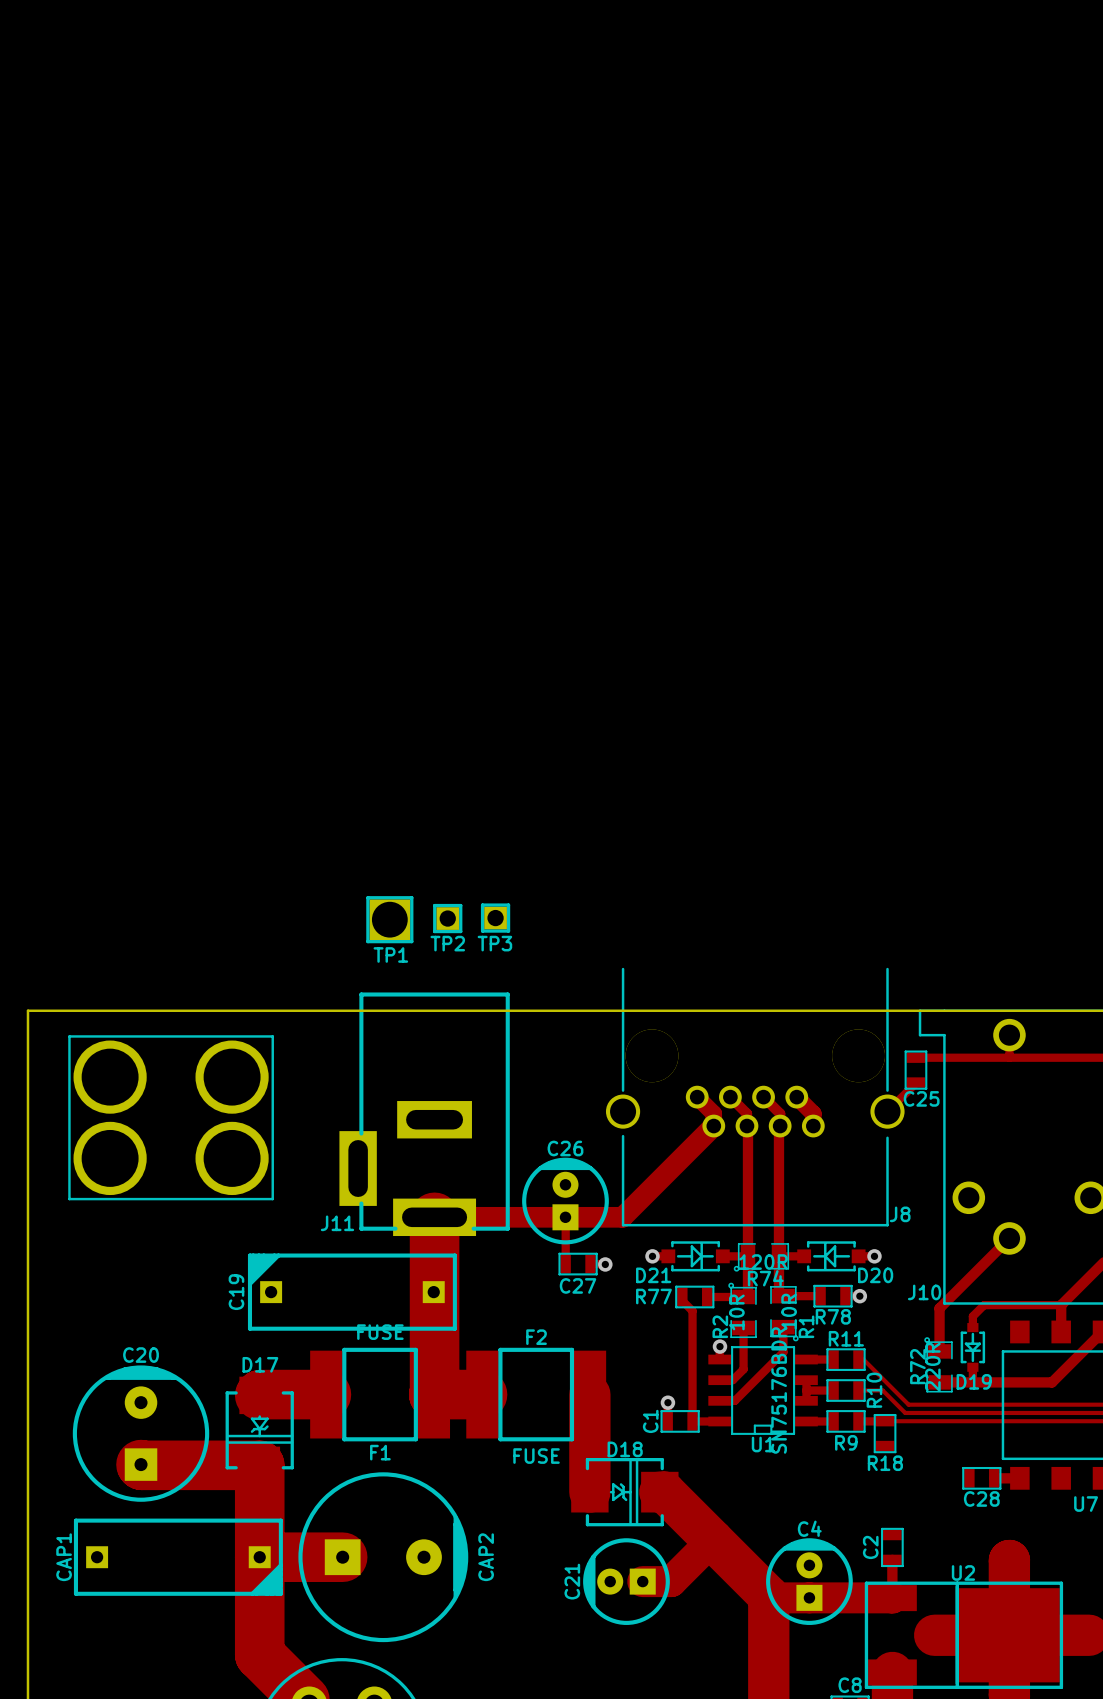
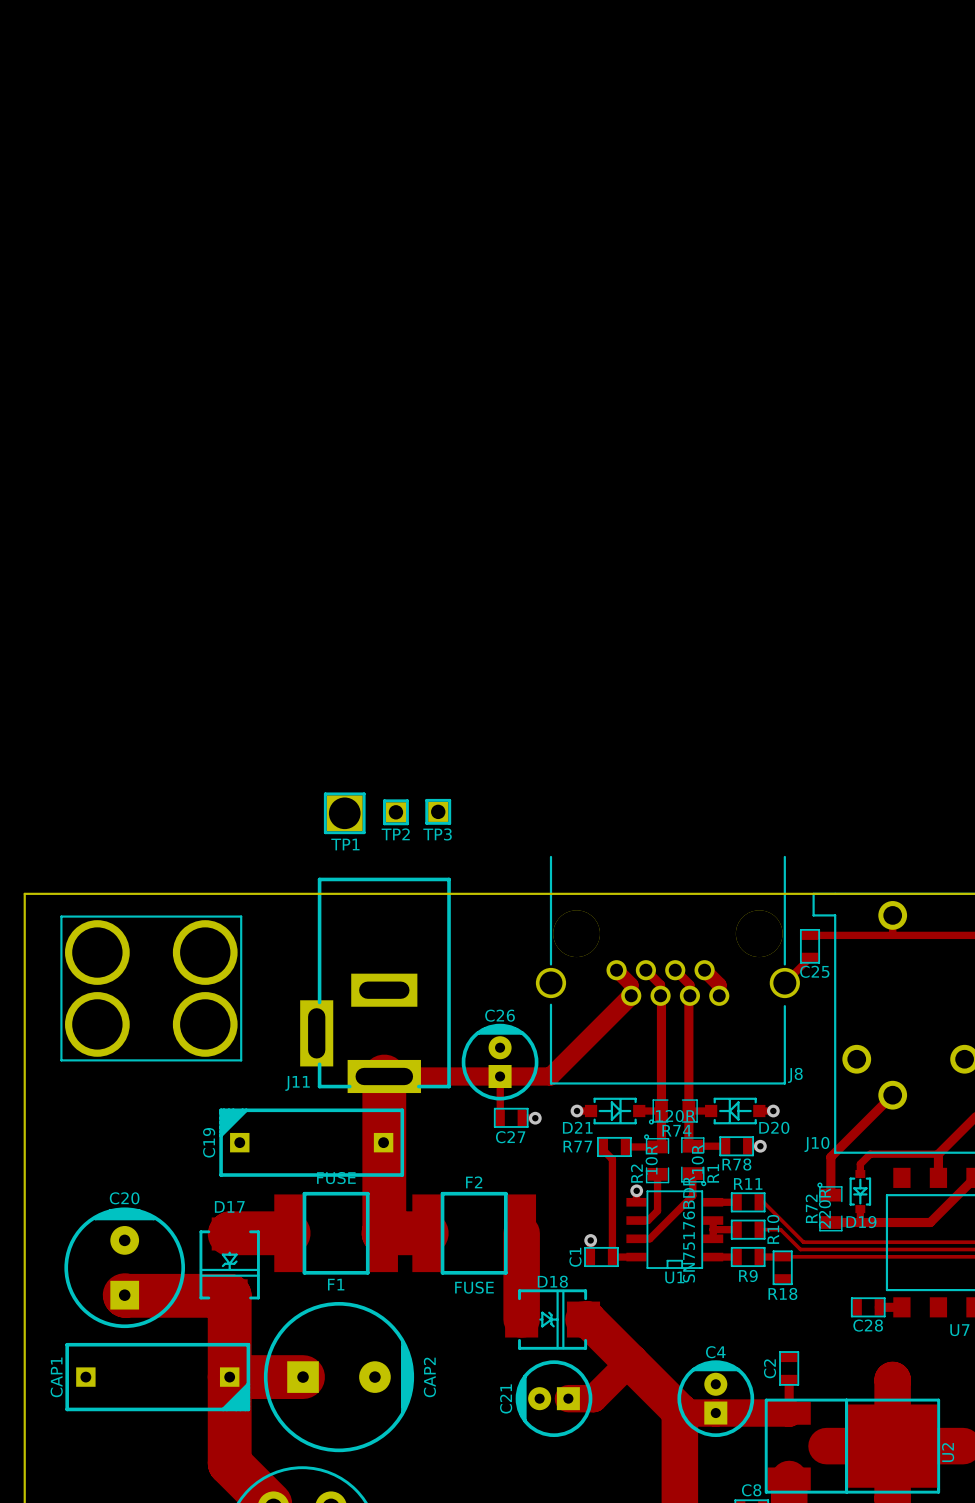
U2 name rotation: 0° (963, 1572) -> 90° counterclockwise (948, 1452)
U2 name position: U2 (963, 1572) -> U2 (948, 1452)

